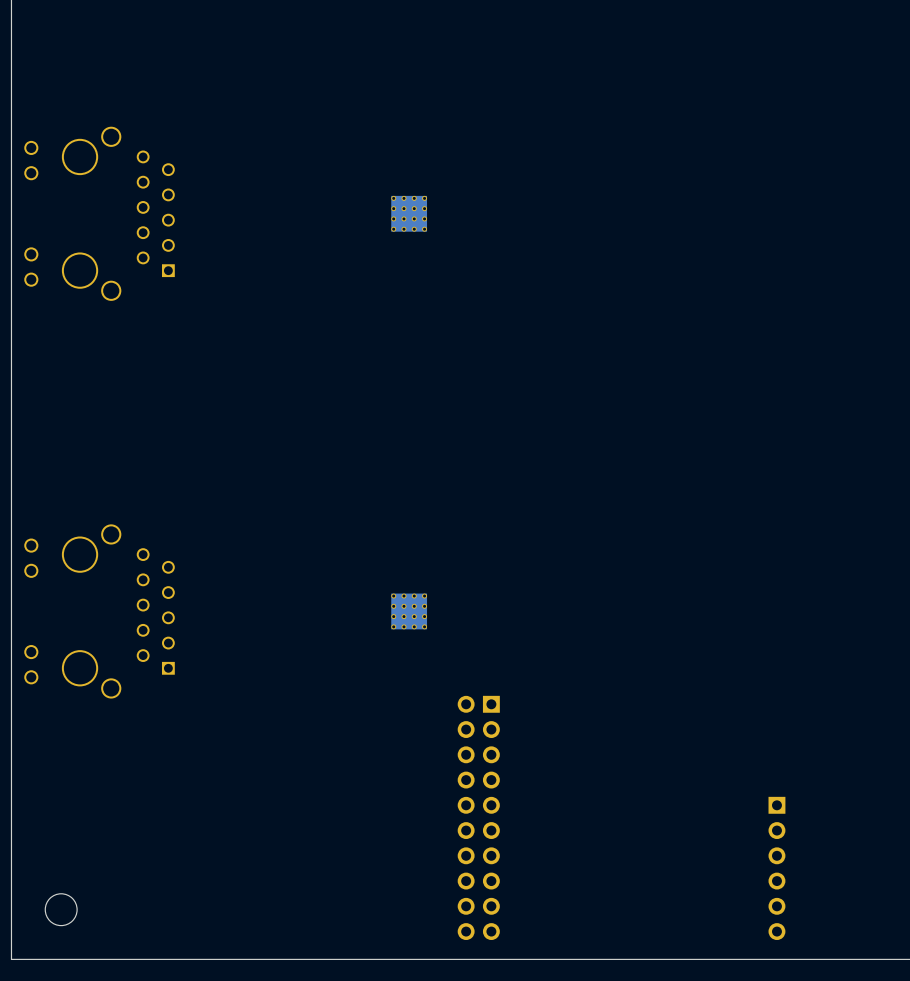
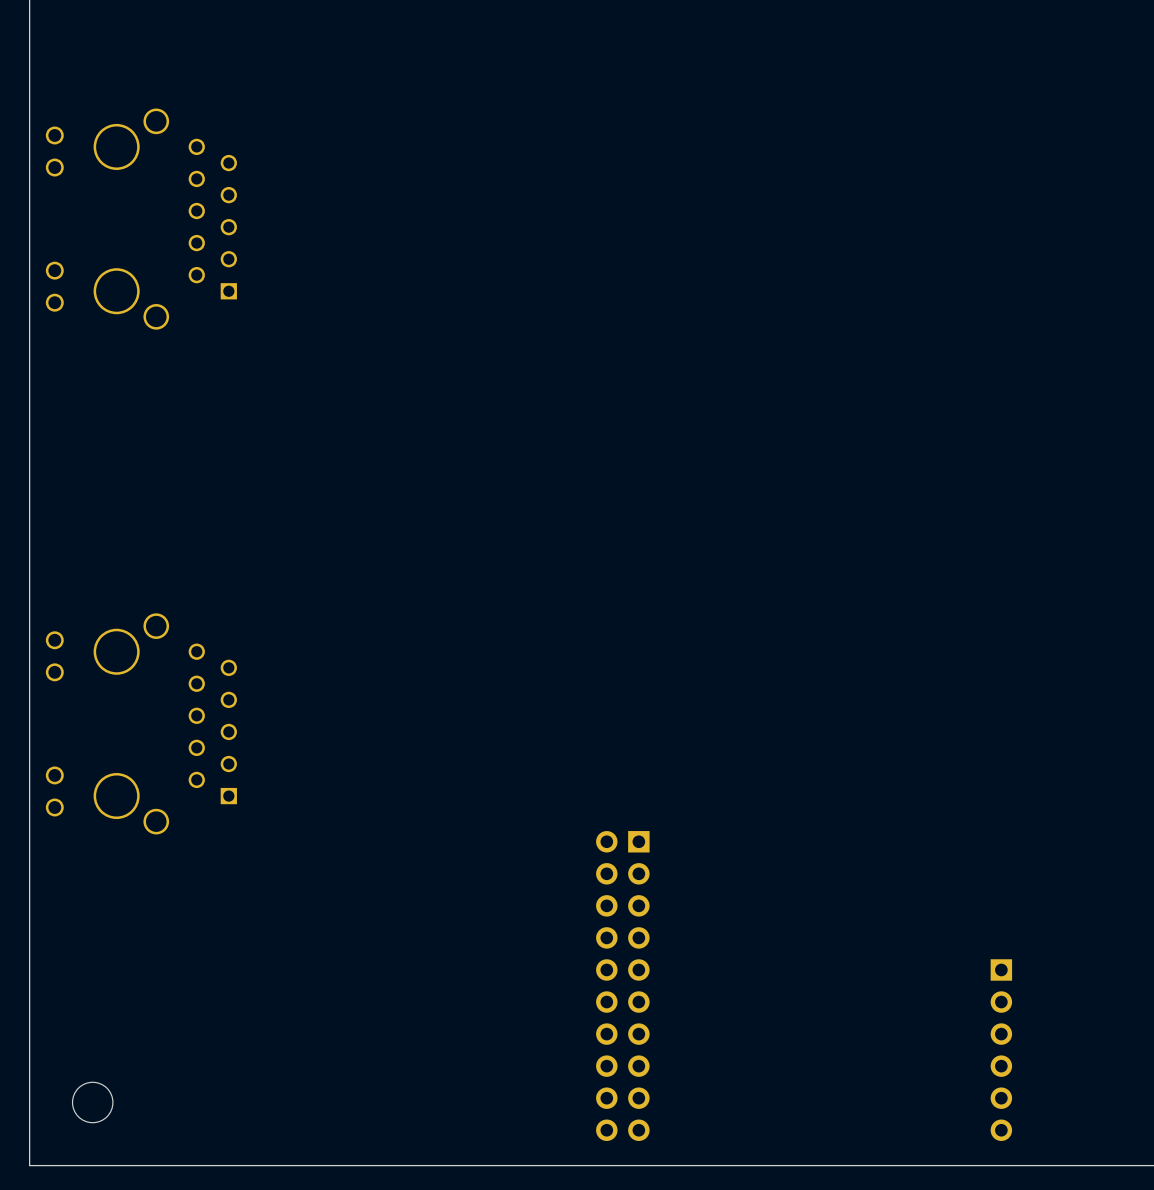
part: (409, 213) -> none
part: (409, 611) -> none

